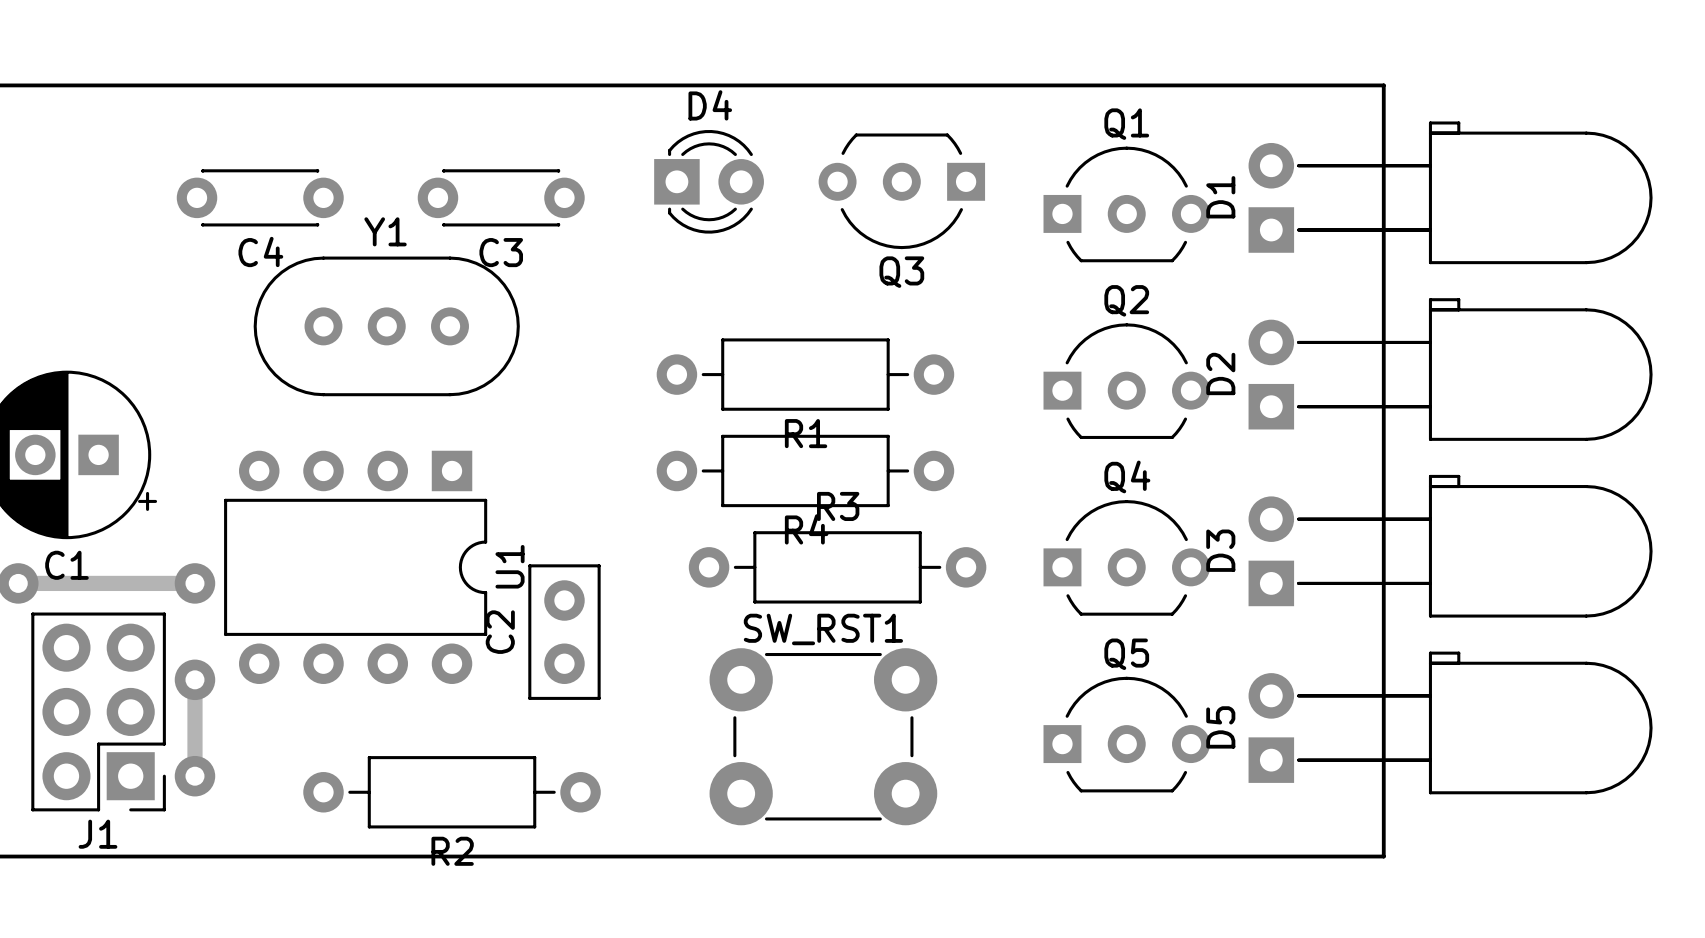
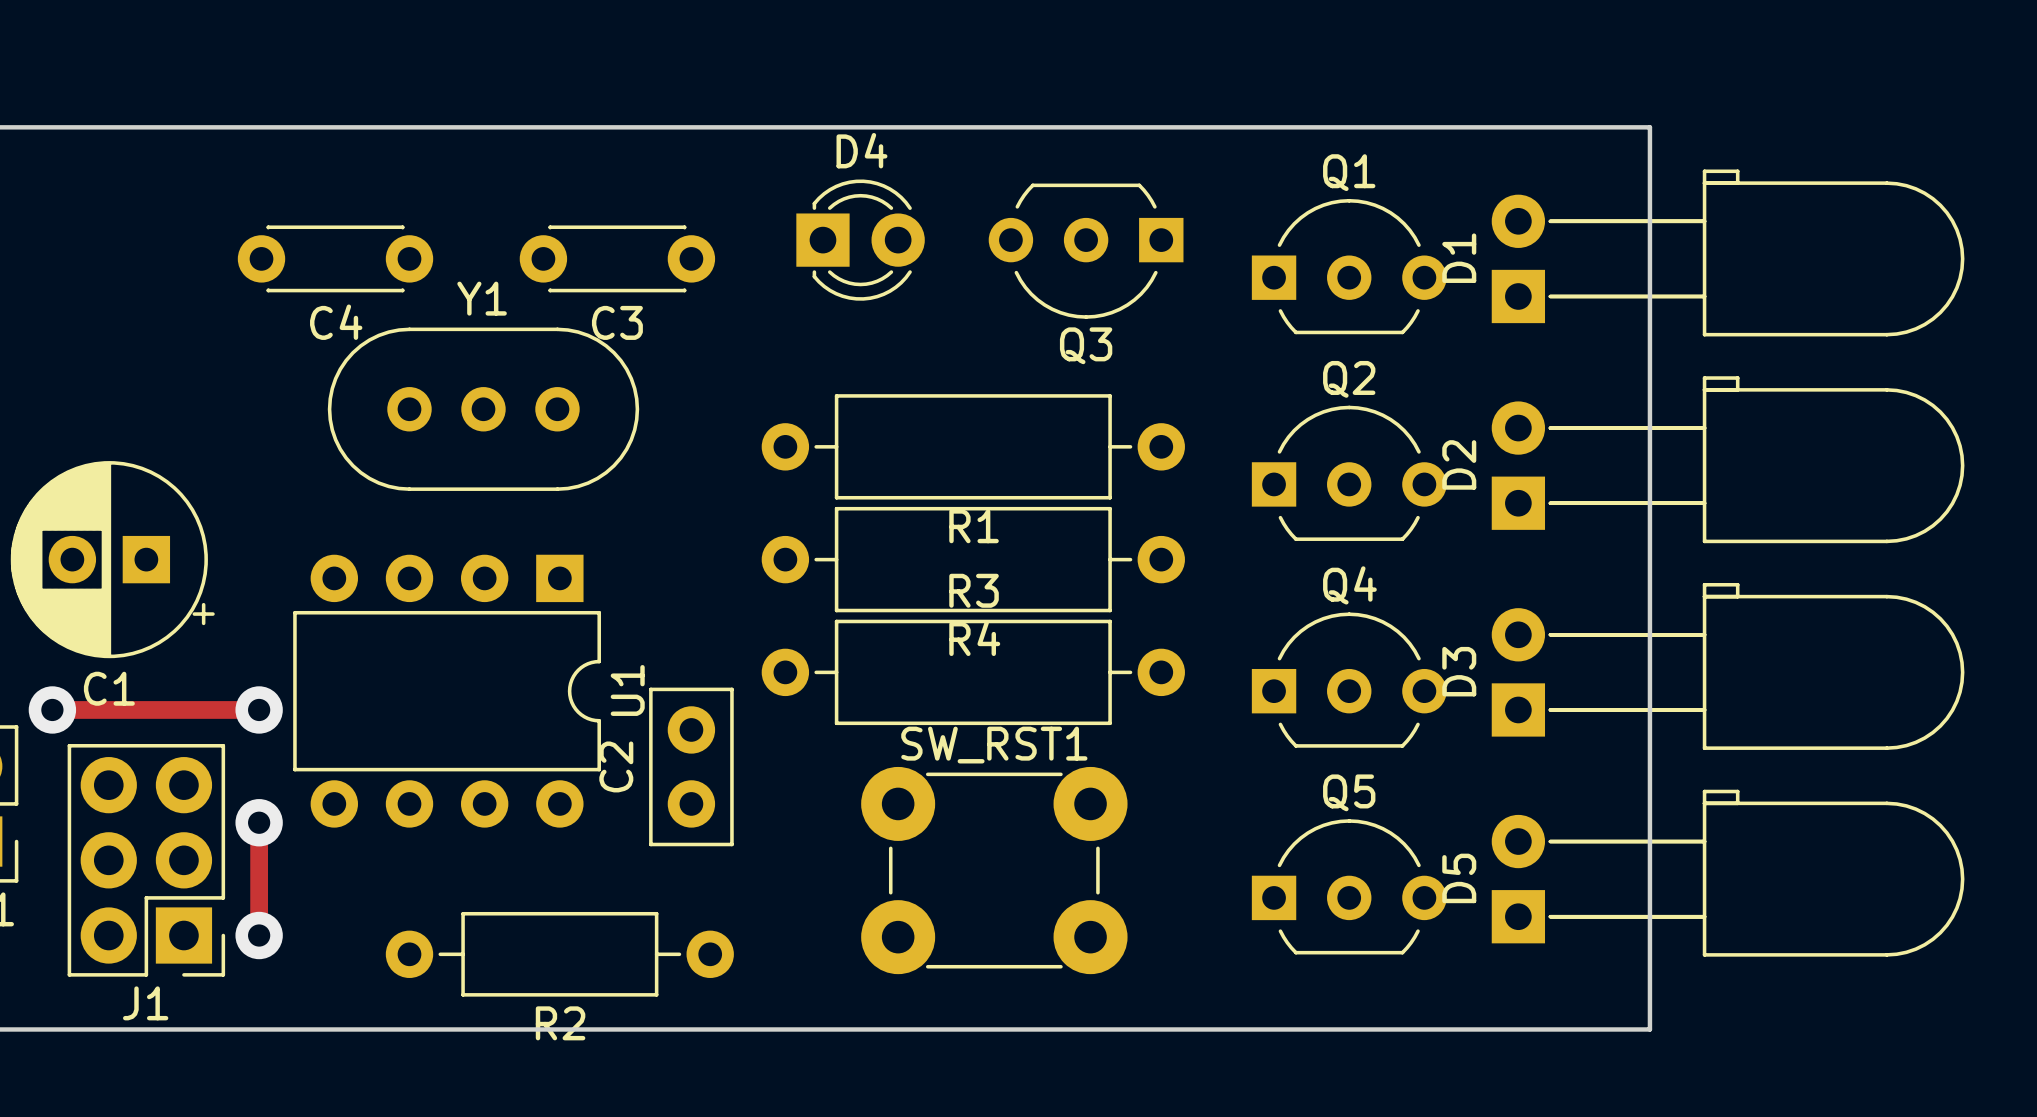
R1 footprint: [656, 338, 955, 411] -> [761, 394, 1185, 500]
R4 footprint: [656, 434, 955, 508] -> [761, 506, 1185, 613]
R3 footprint: [688, 531, 987, 604] -> [761, 619, 1185, 726]
SW_RST1 position: (823, 736) -> (994, 870)

